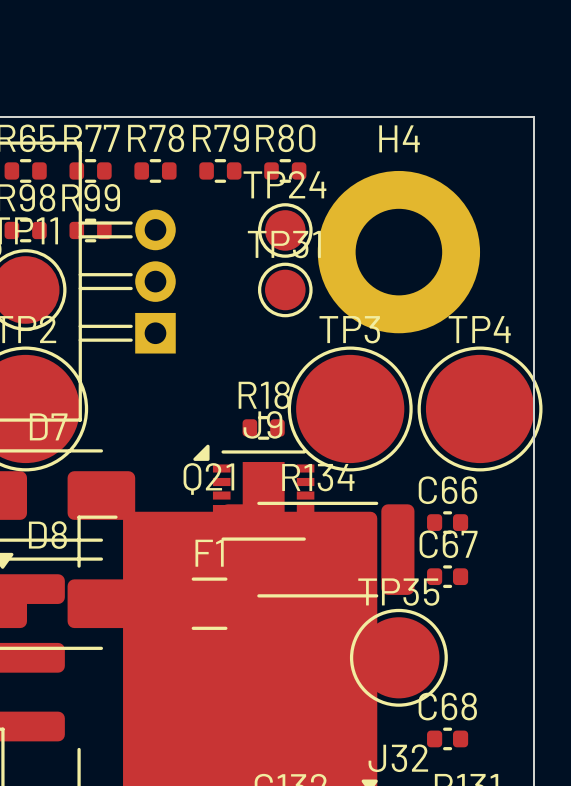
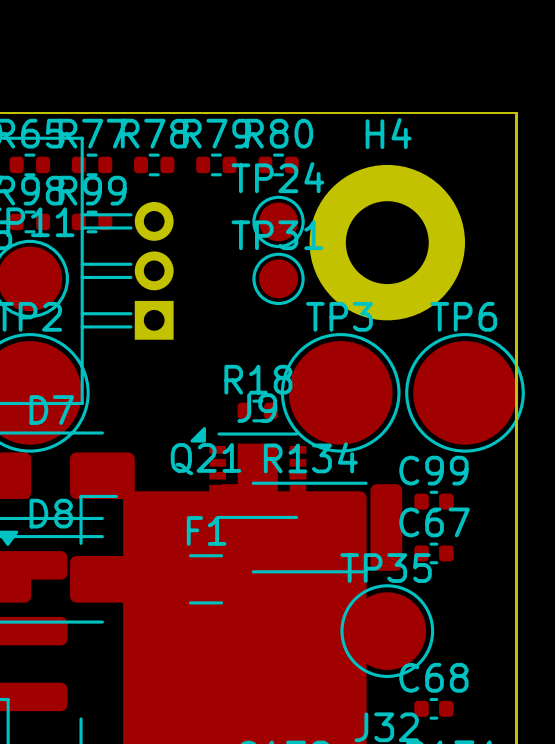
TP4 name: TP4 (479, 329) -> TP6 (463, 316)
C66 name: C66 (448, 490) -> C99 (433, 470)

